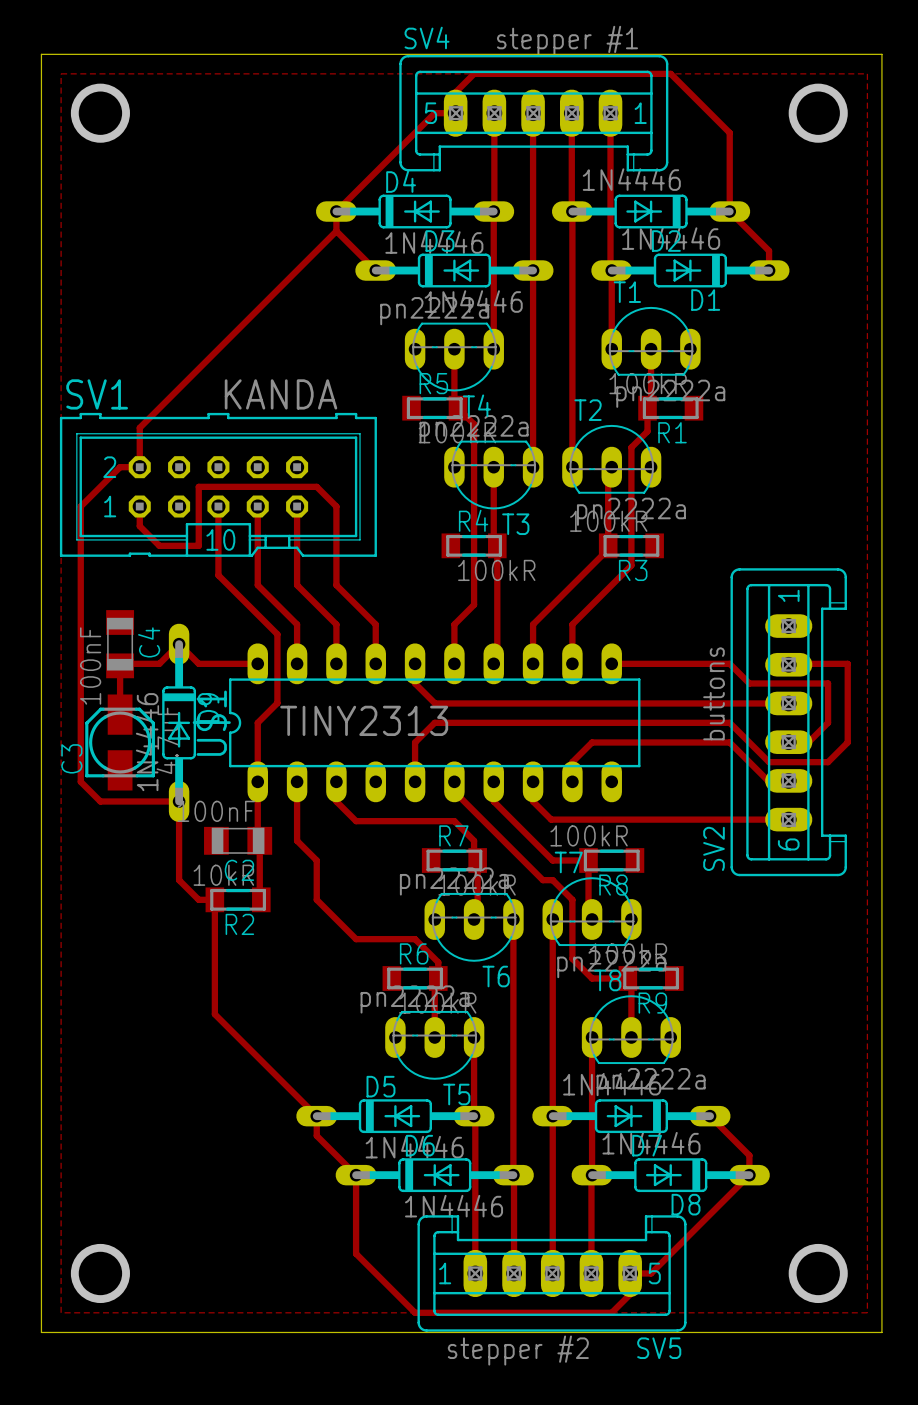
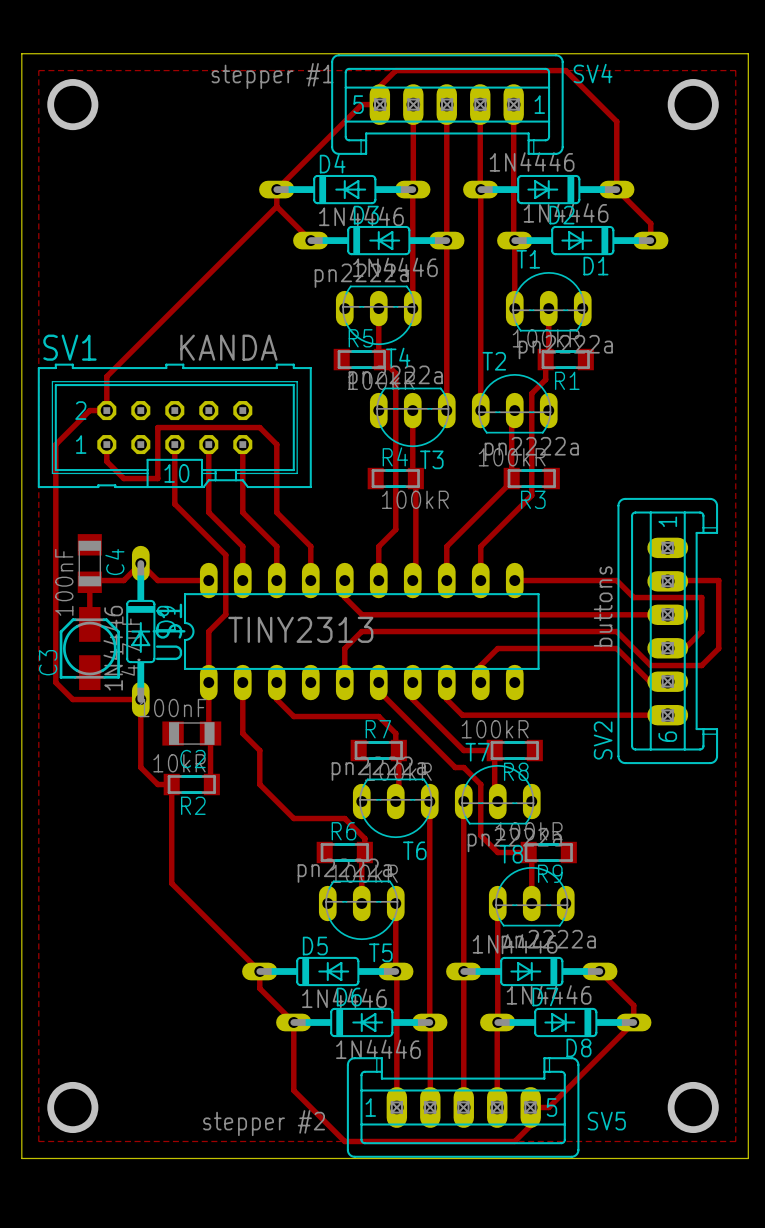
SV4 name position: SV4 (427, 38) -> SV4 (593, 73)
SV4 value position: stepper #1 (567, 40) -> stepper #1 (272, 76)
SV5 name position: SV5 (659, 1348) -> SV5 (606, 1121)
SV5 value position: stepper #2 (518, 1350) -> stepper #2 (264, 1123)

